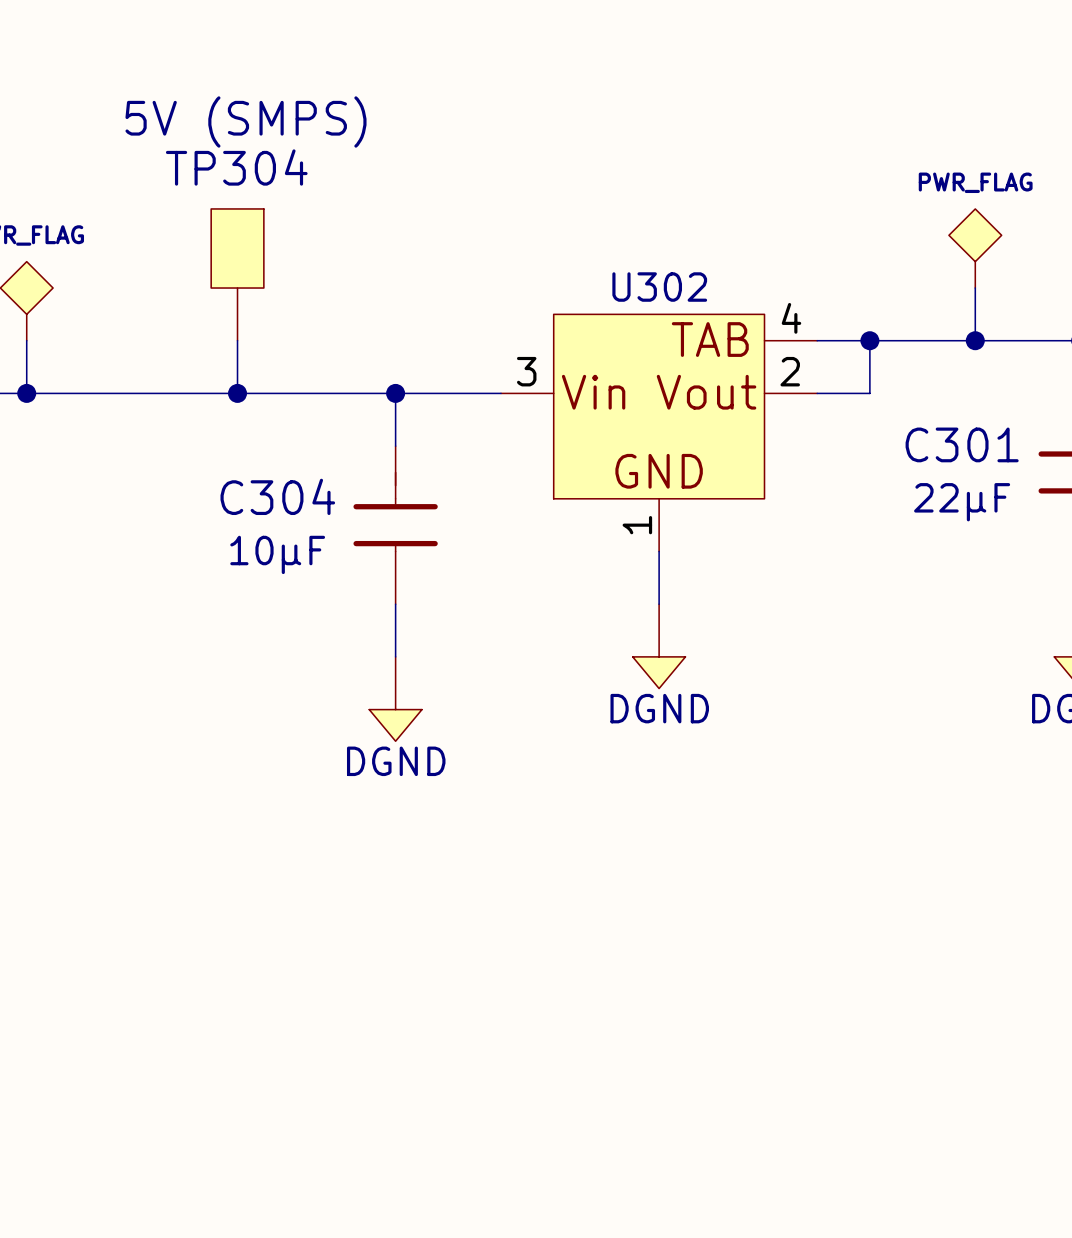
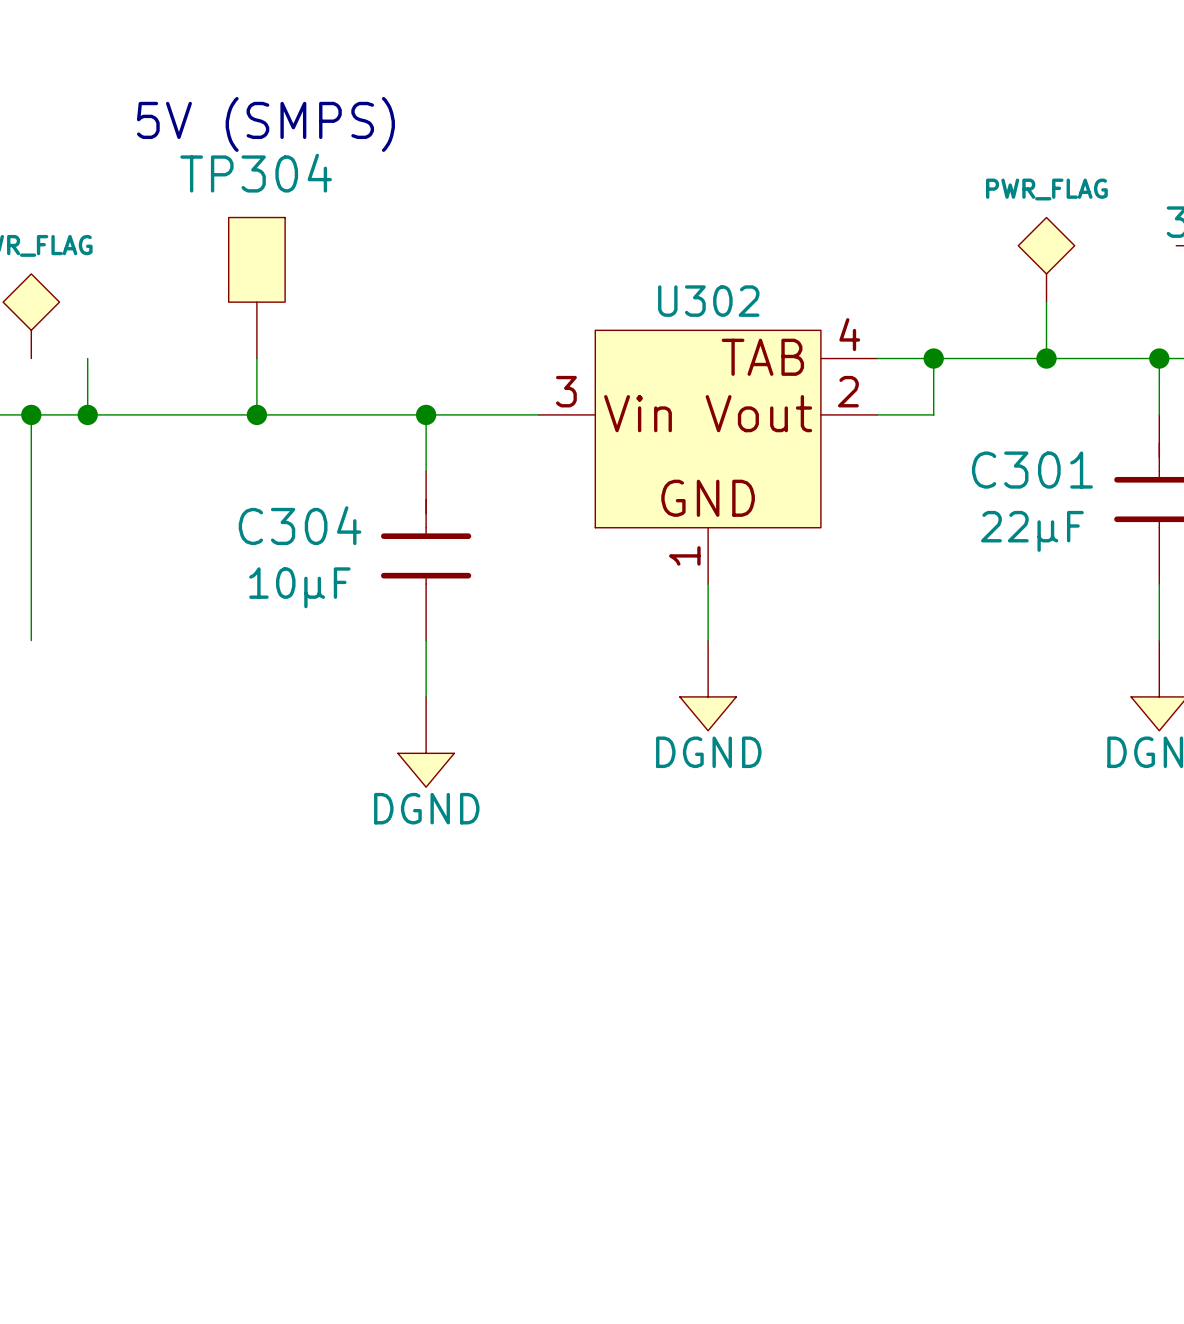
wire: (26, 340) (26, 393) -> (31, 640) (31, 414)
wire: none -> (87, 358) (87, 414)
junction: none -> (87, 414)

